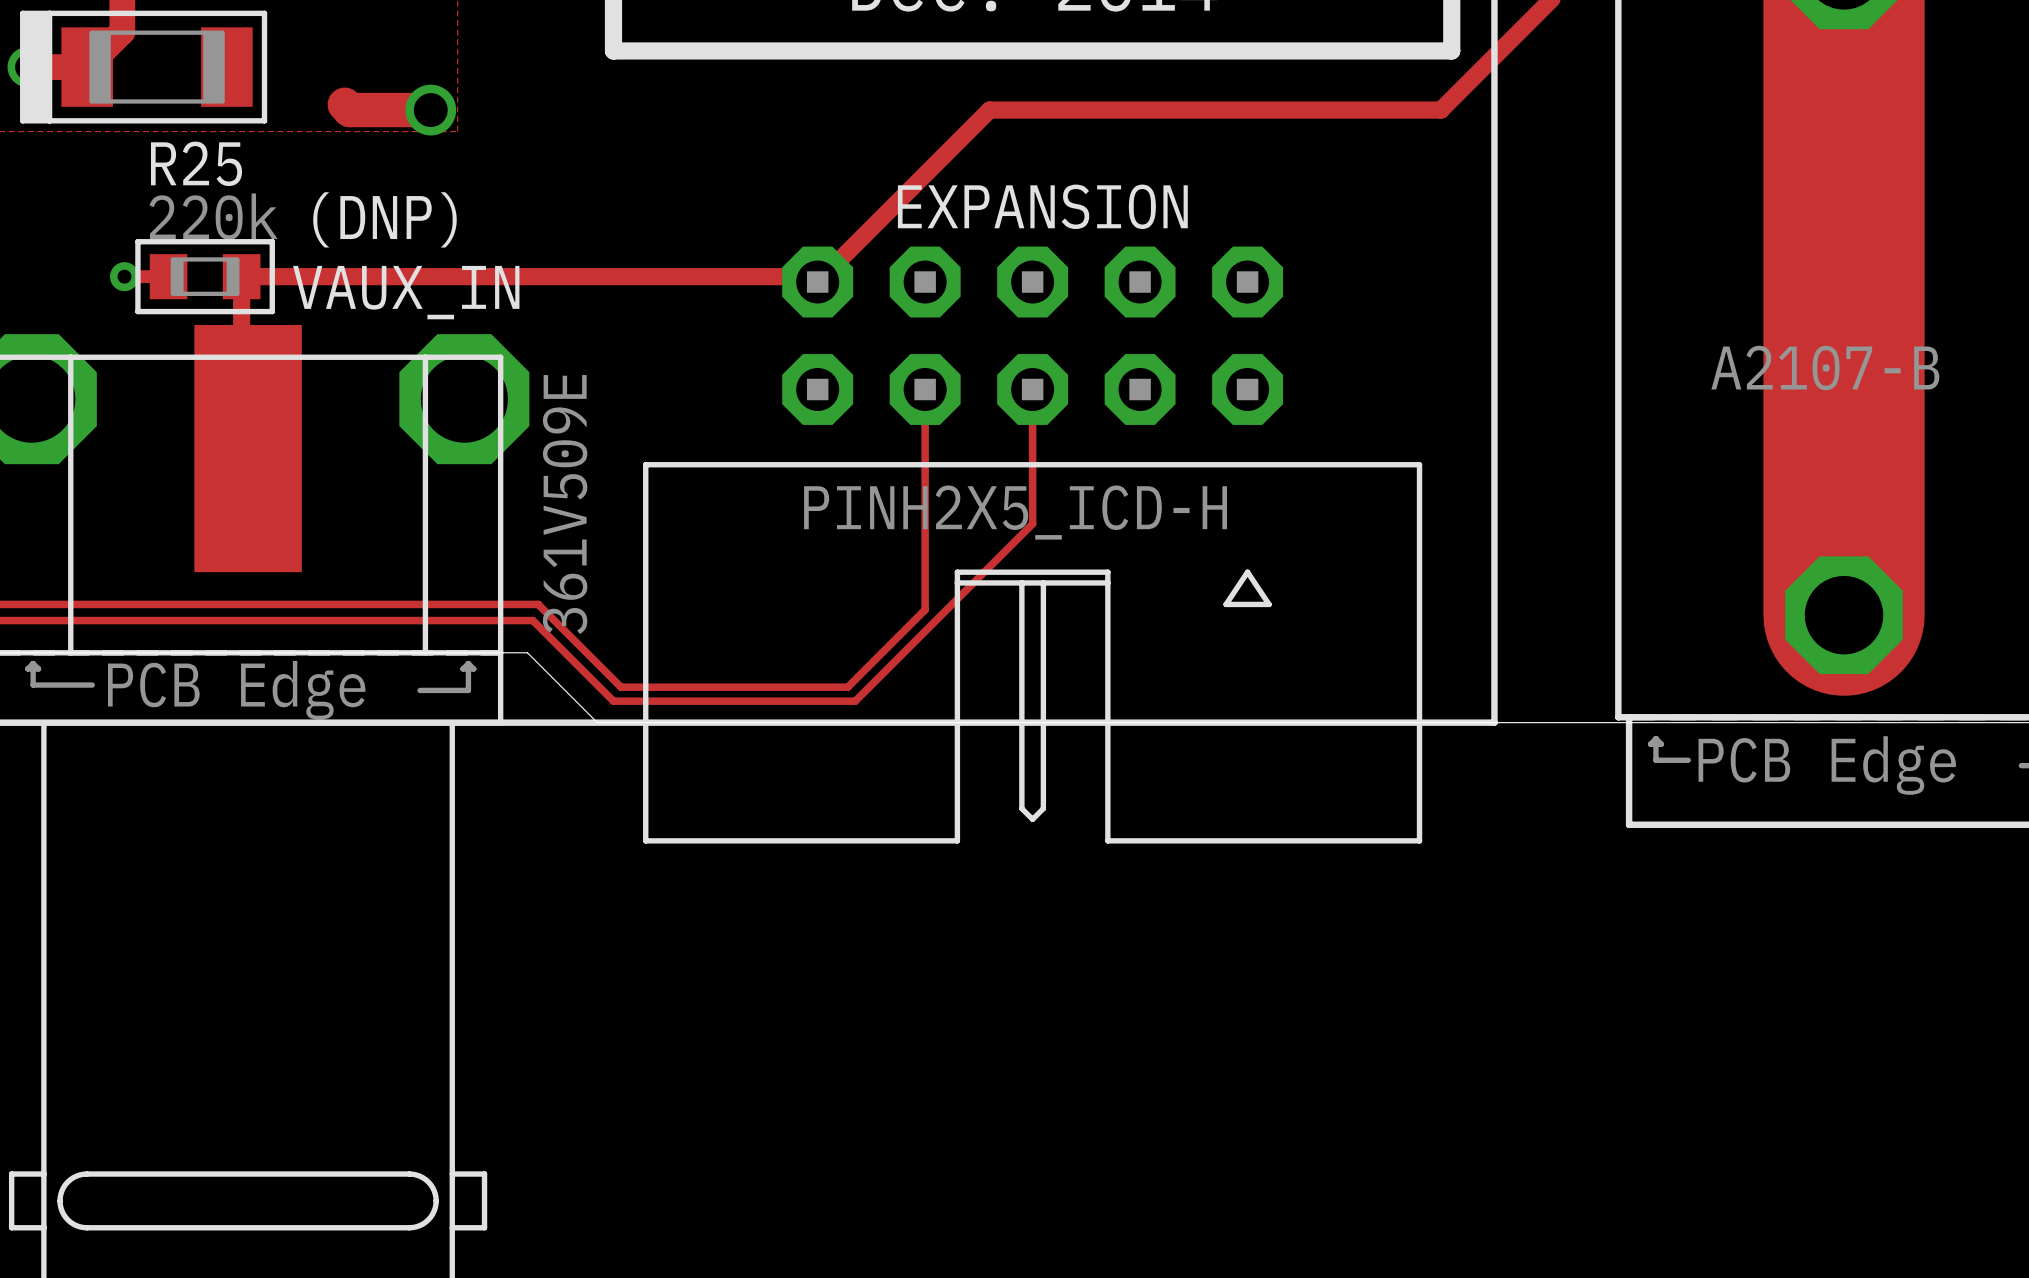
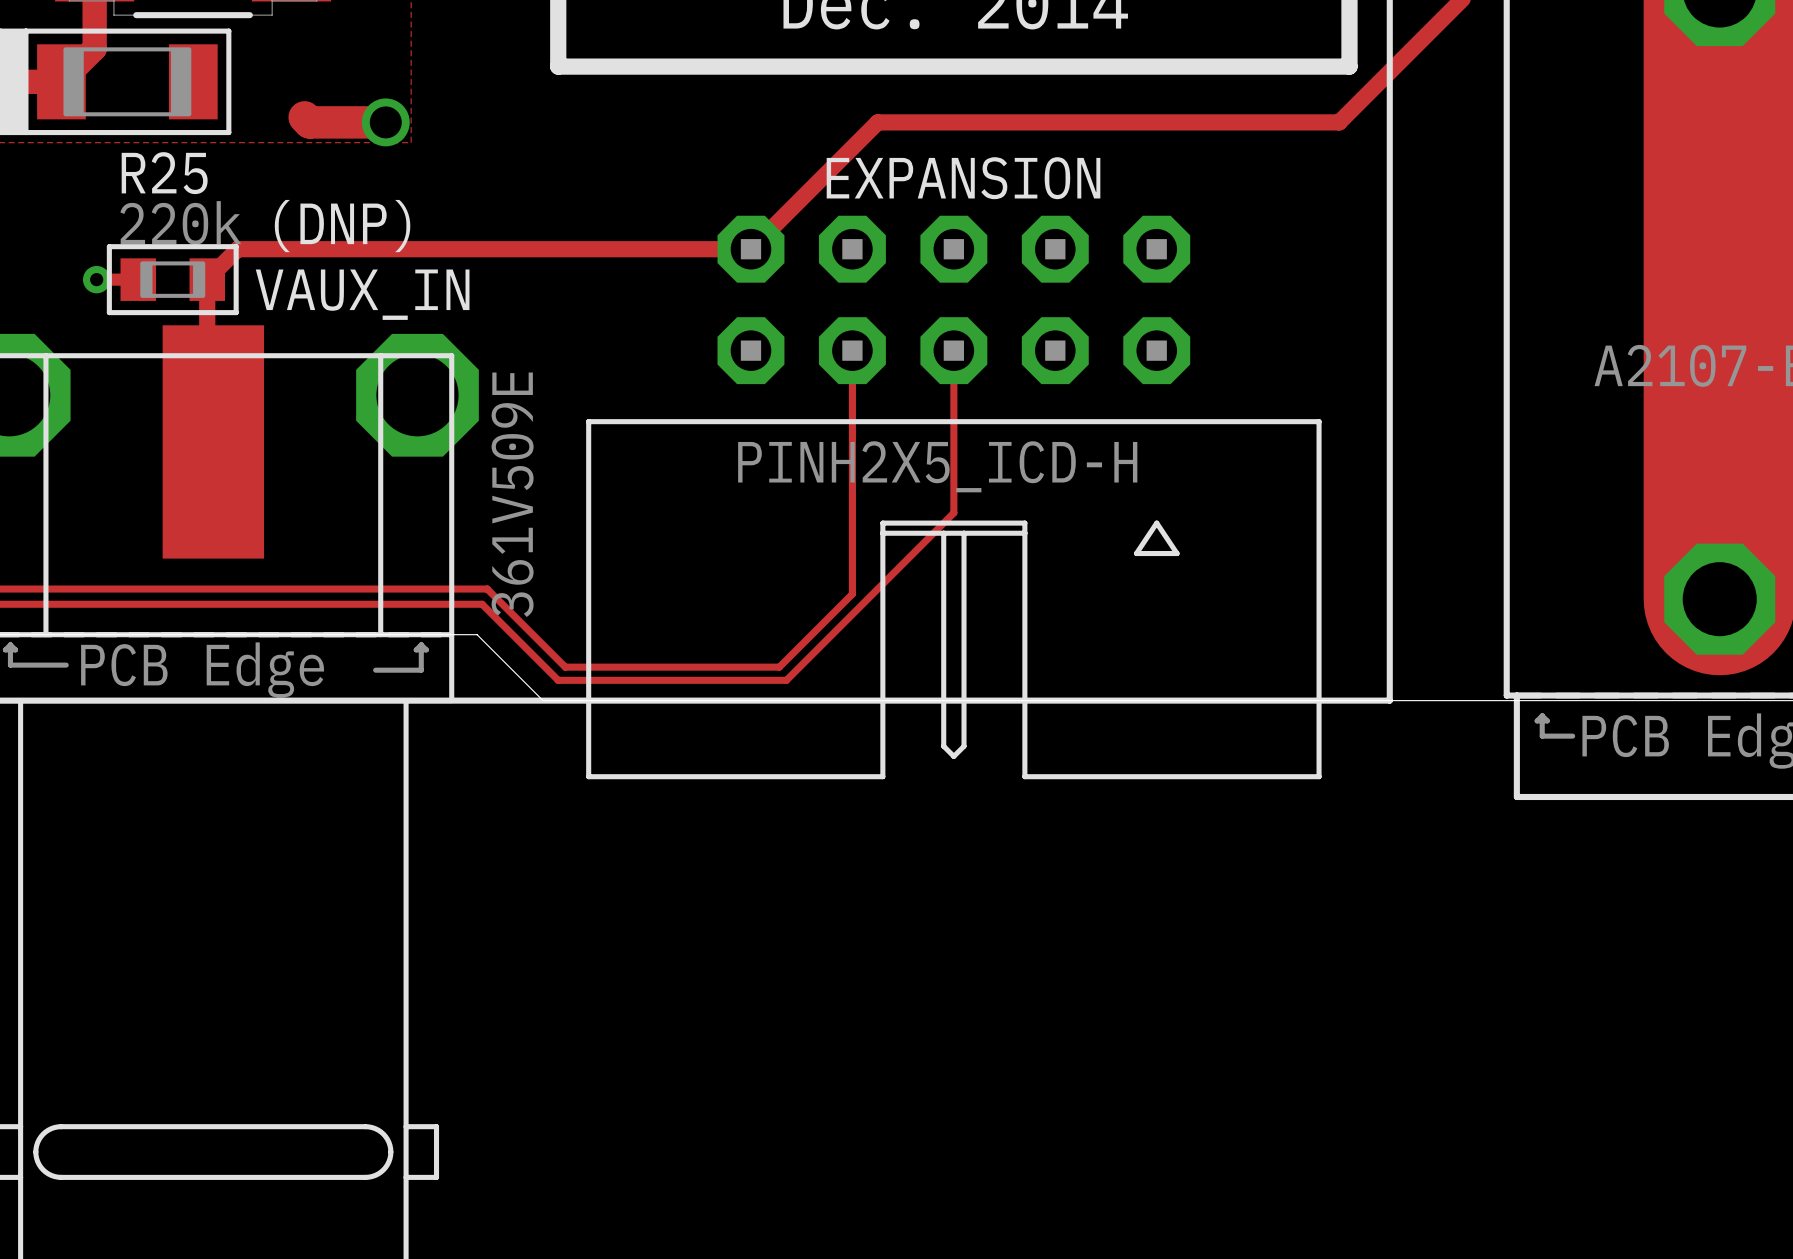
track: (989, 110) (817, 282) (812, 276) (241, 276) -> (913, 122) (877, 122) (750, 249) (237, 249) (207, 279)
EXPANSION position: (1032, 545) -> (953, 497)

